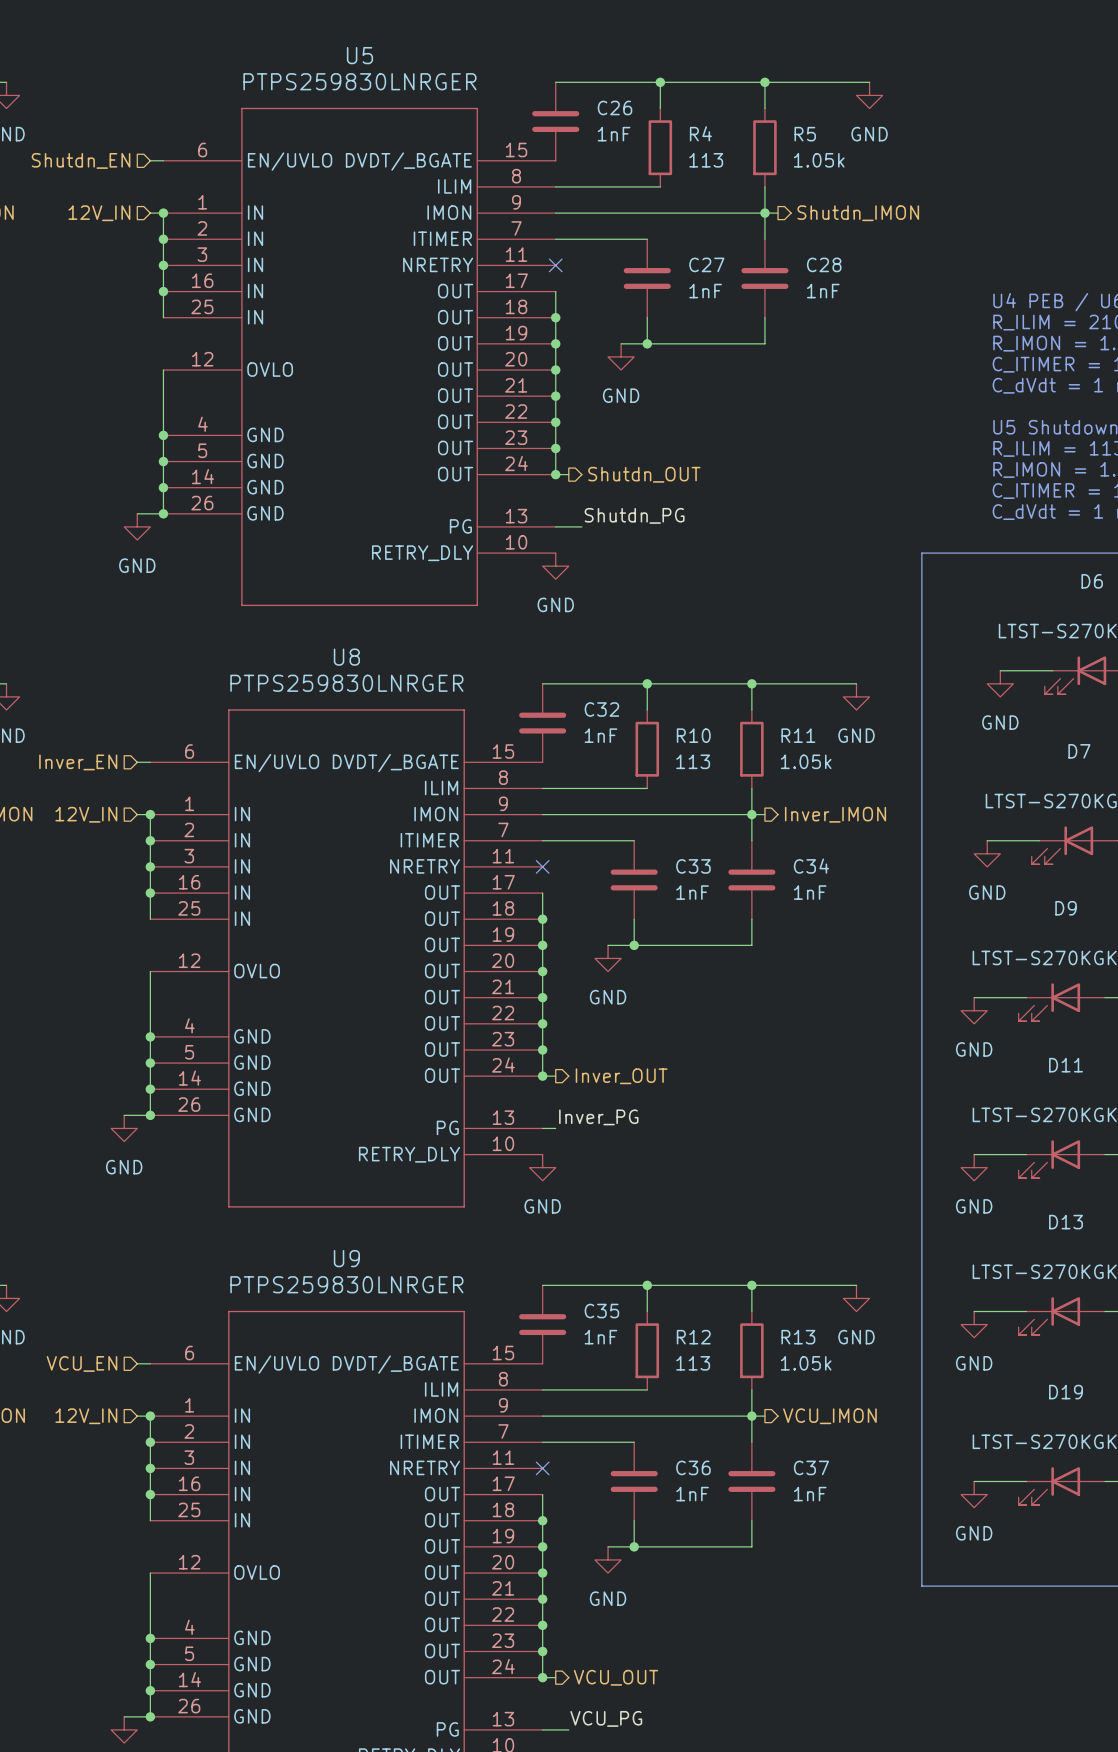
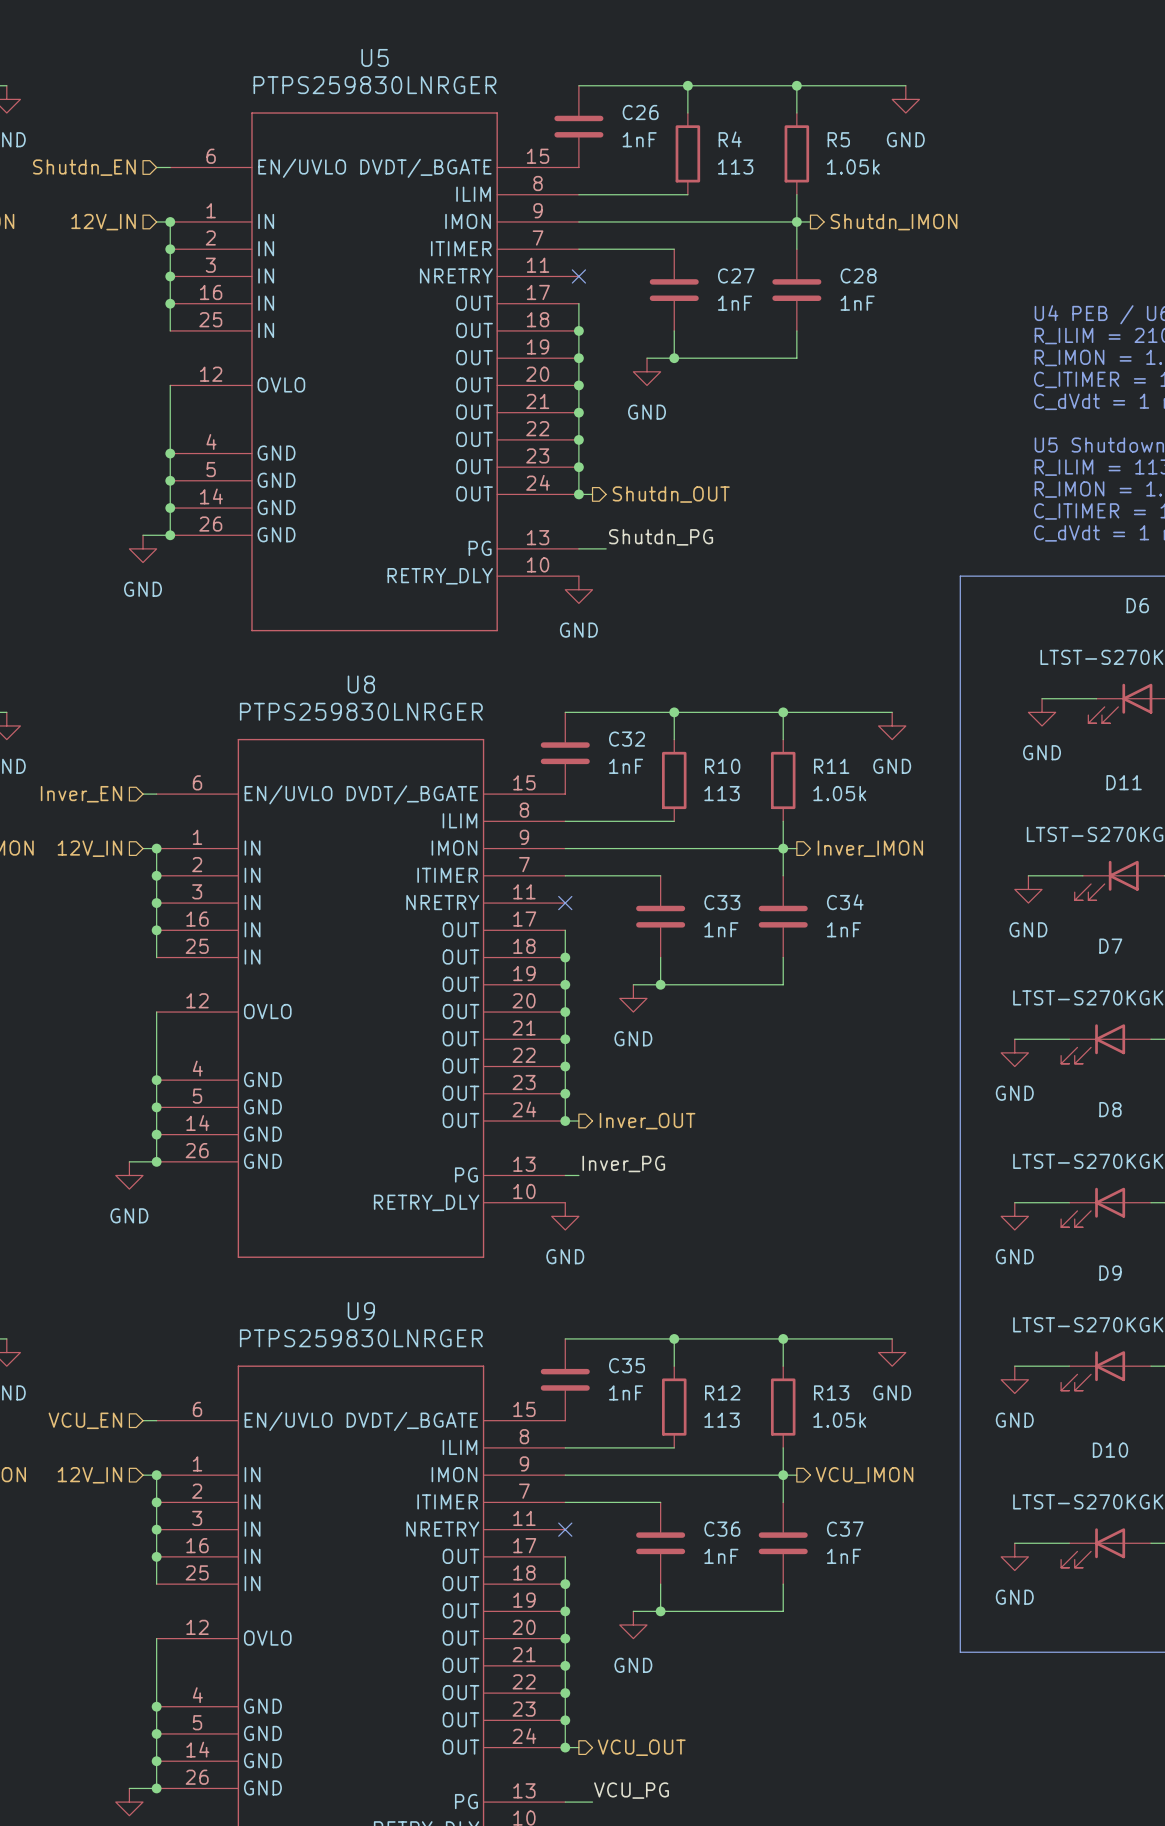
D7 name: D7 (1079, 751) -> D11 (1124, 782)
D9 name: D9 (1066, 908) -> D7 (1110, 946)
D11 name: D11 (1066, 1065) -> D8 (1110, 1109)
D13 name: D13 (1066, 1222) -> D9 (1110, 1273)
D19 name: D19 (1066, 1392) -> D10 (1110, 1450)

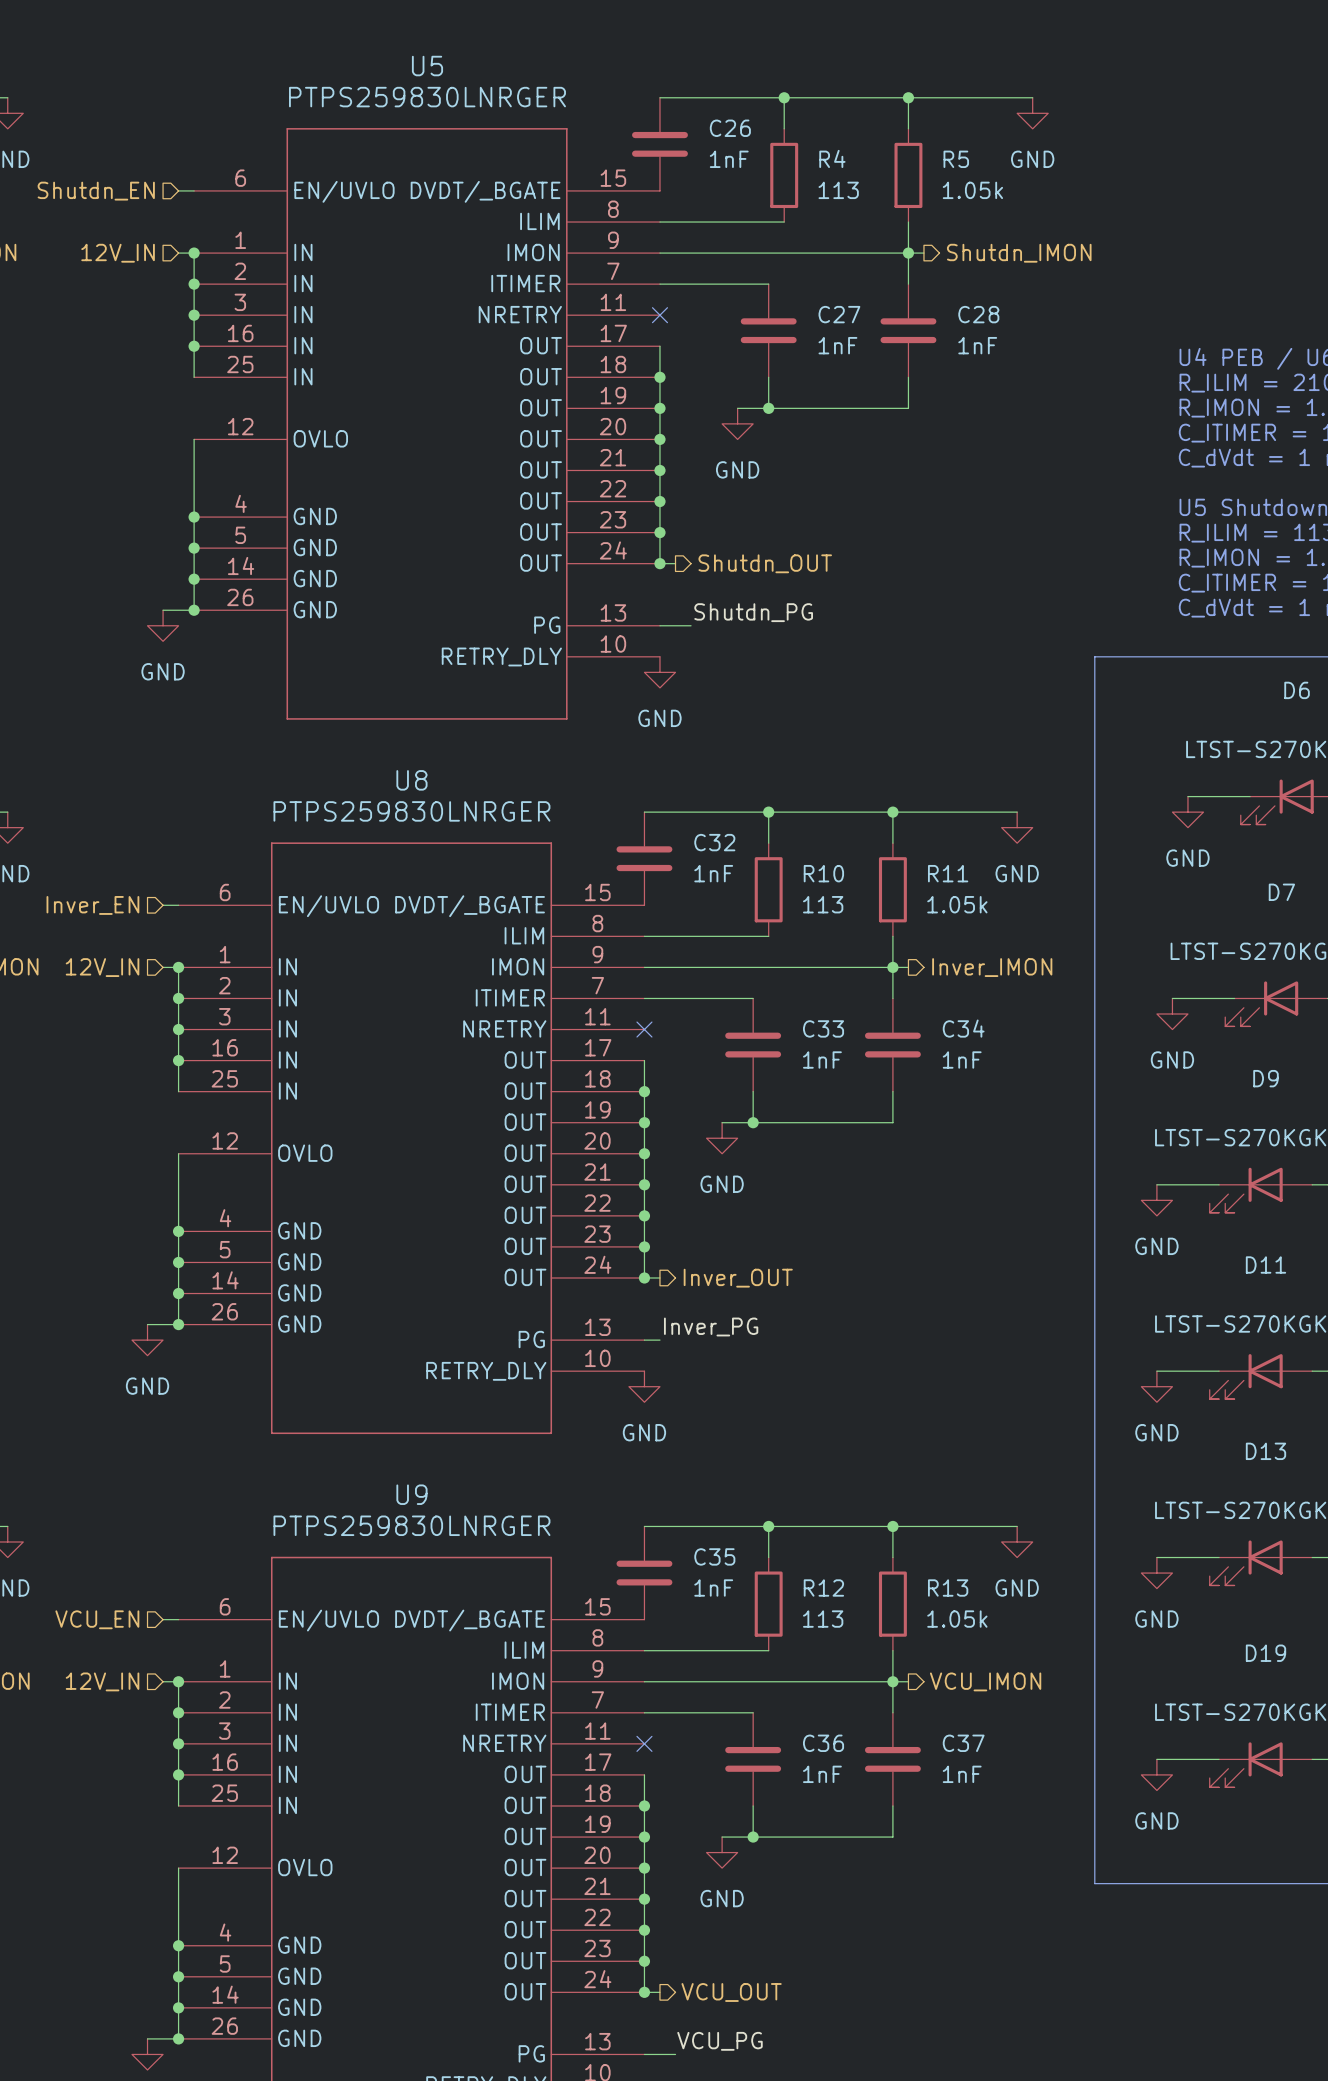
D11 name: D11 (1124, 782) -> D7 (1281, 892)
D7 name: D7 (1110, 946) -> D9 (1265, 1078)
D8 name: D8 (1110, 1109) -> D11 (1265, 1264)
D9 name: D9 (1110, 1273) -> D13 (1265, 1451)
D10 name: D10 (1110, 1450) -> D19 (1265, 1653)

